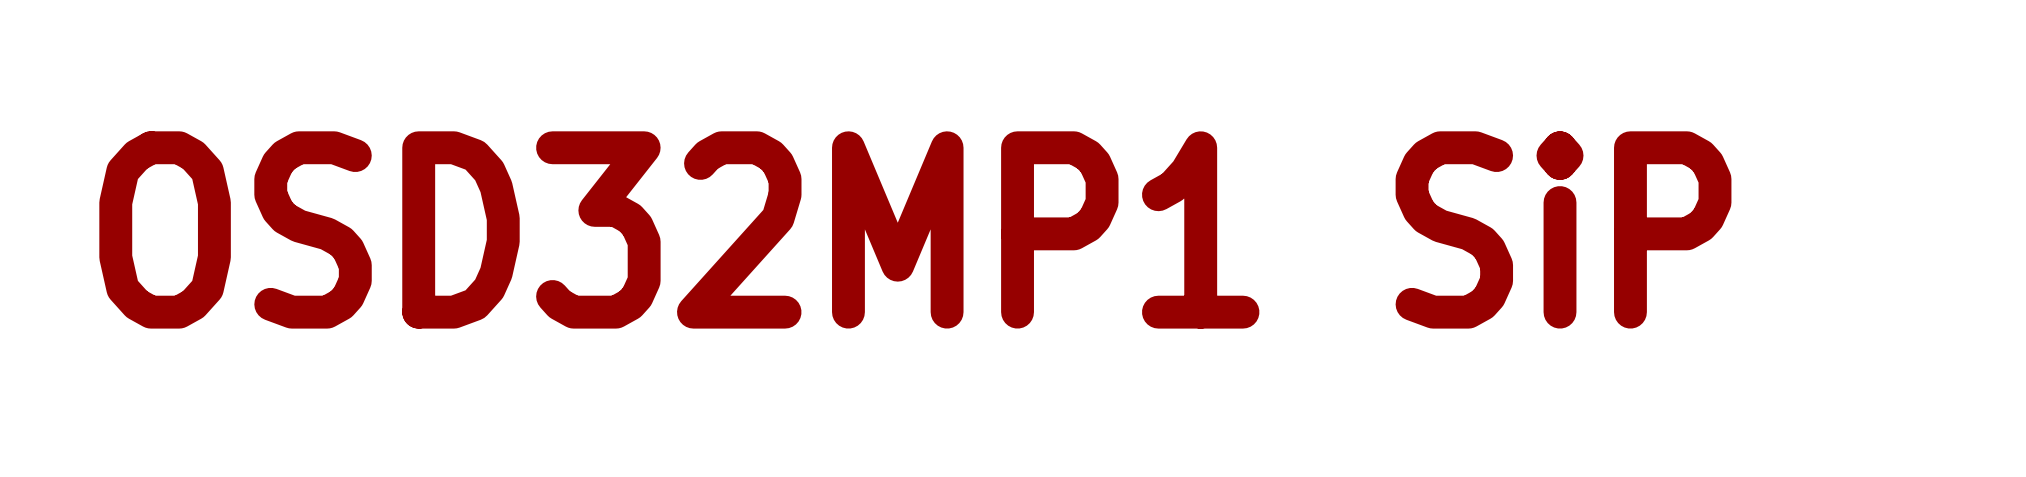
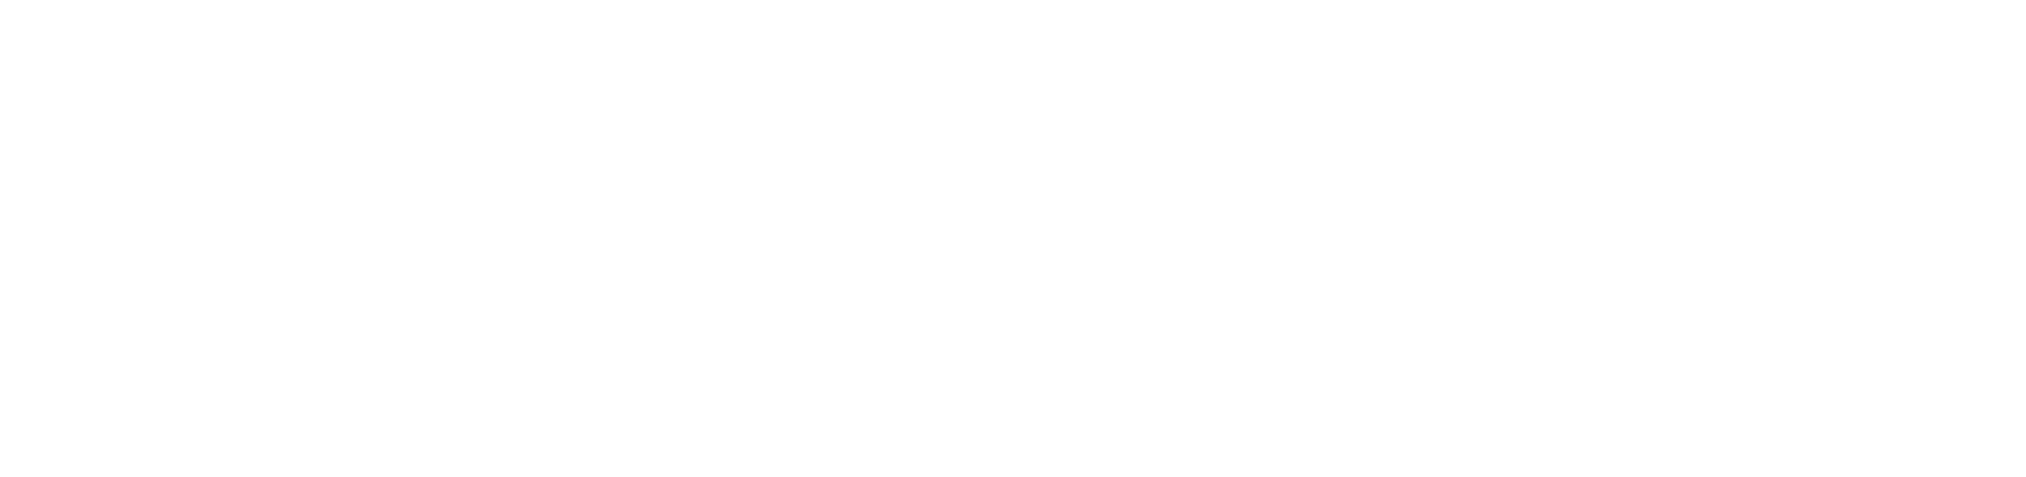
text: OSD32MP1 SiP (915, 229) -> none

